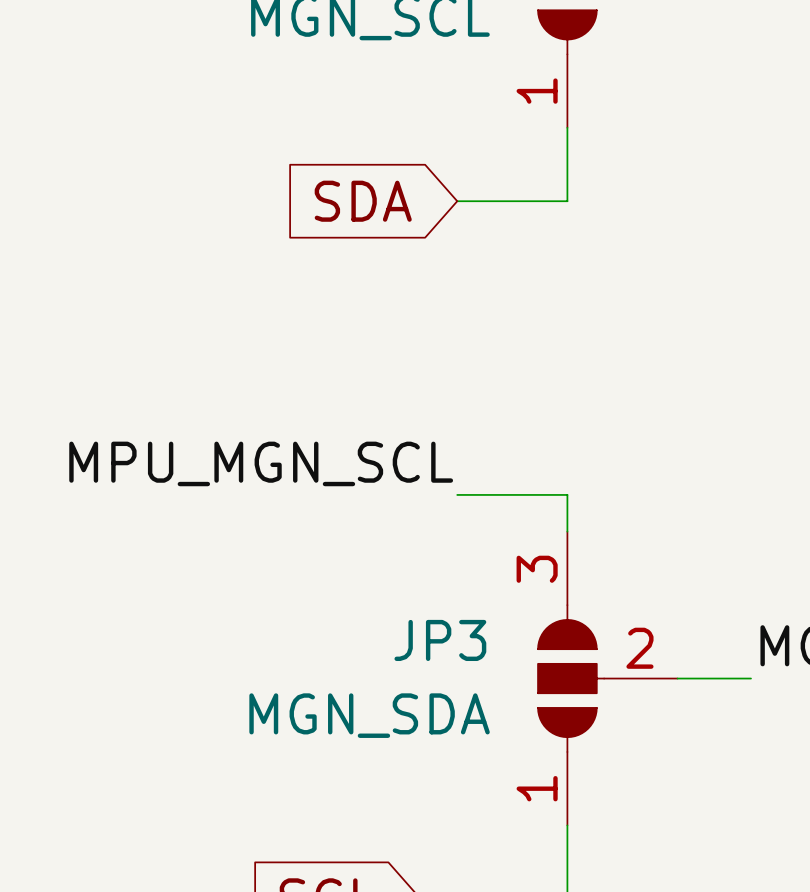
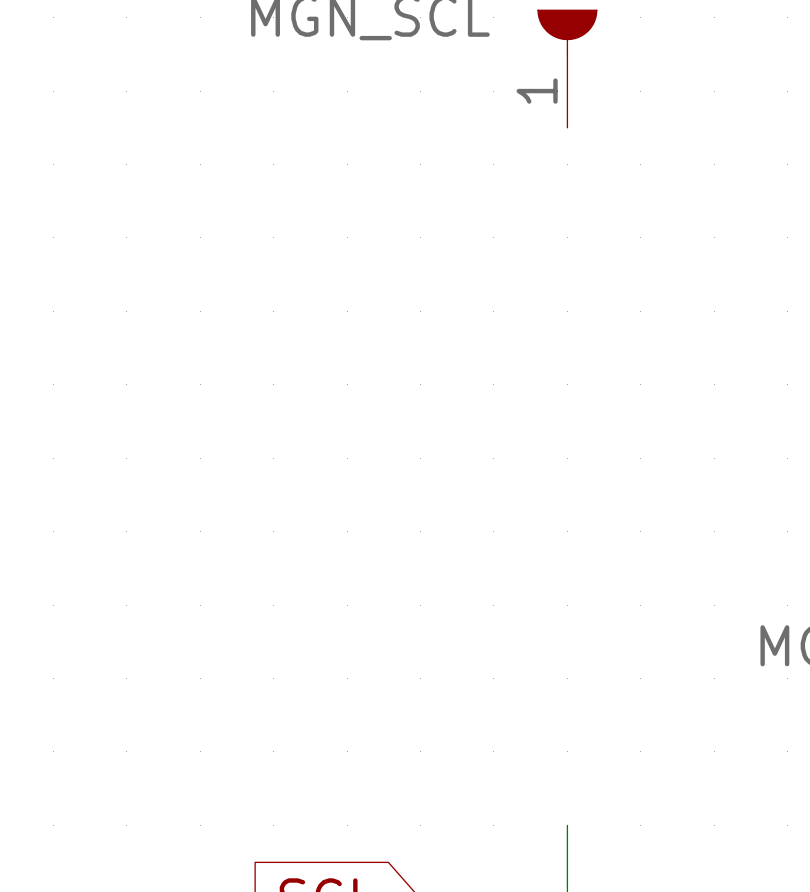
wire: (567, 127) (567, 201) (457, 201) -> none
global label: SDA (363, 201) -> none
label: MPU_MGN_SCL (261, 463) -> none
wire: (457, 494) (567, 494) (567, 531) -> none
JP3: MGN_SDA (607, 678) -> none
wire: (677, 678) (750, 678) -> none

